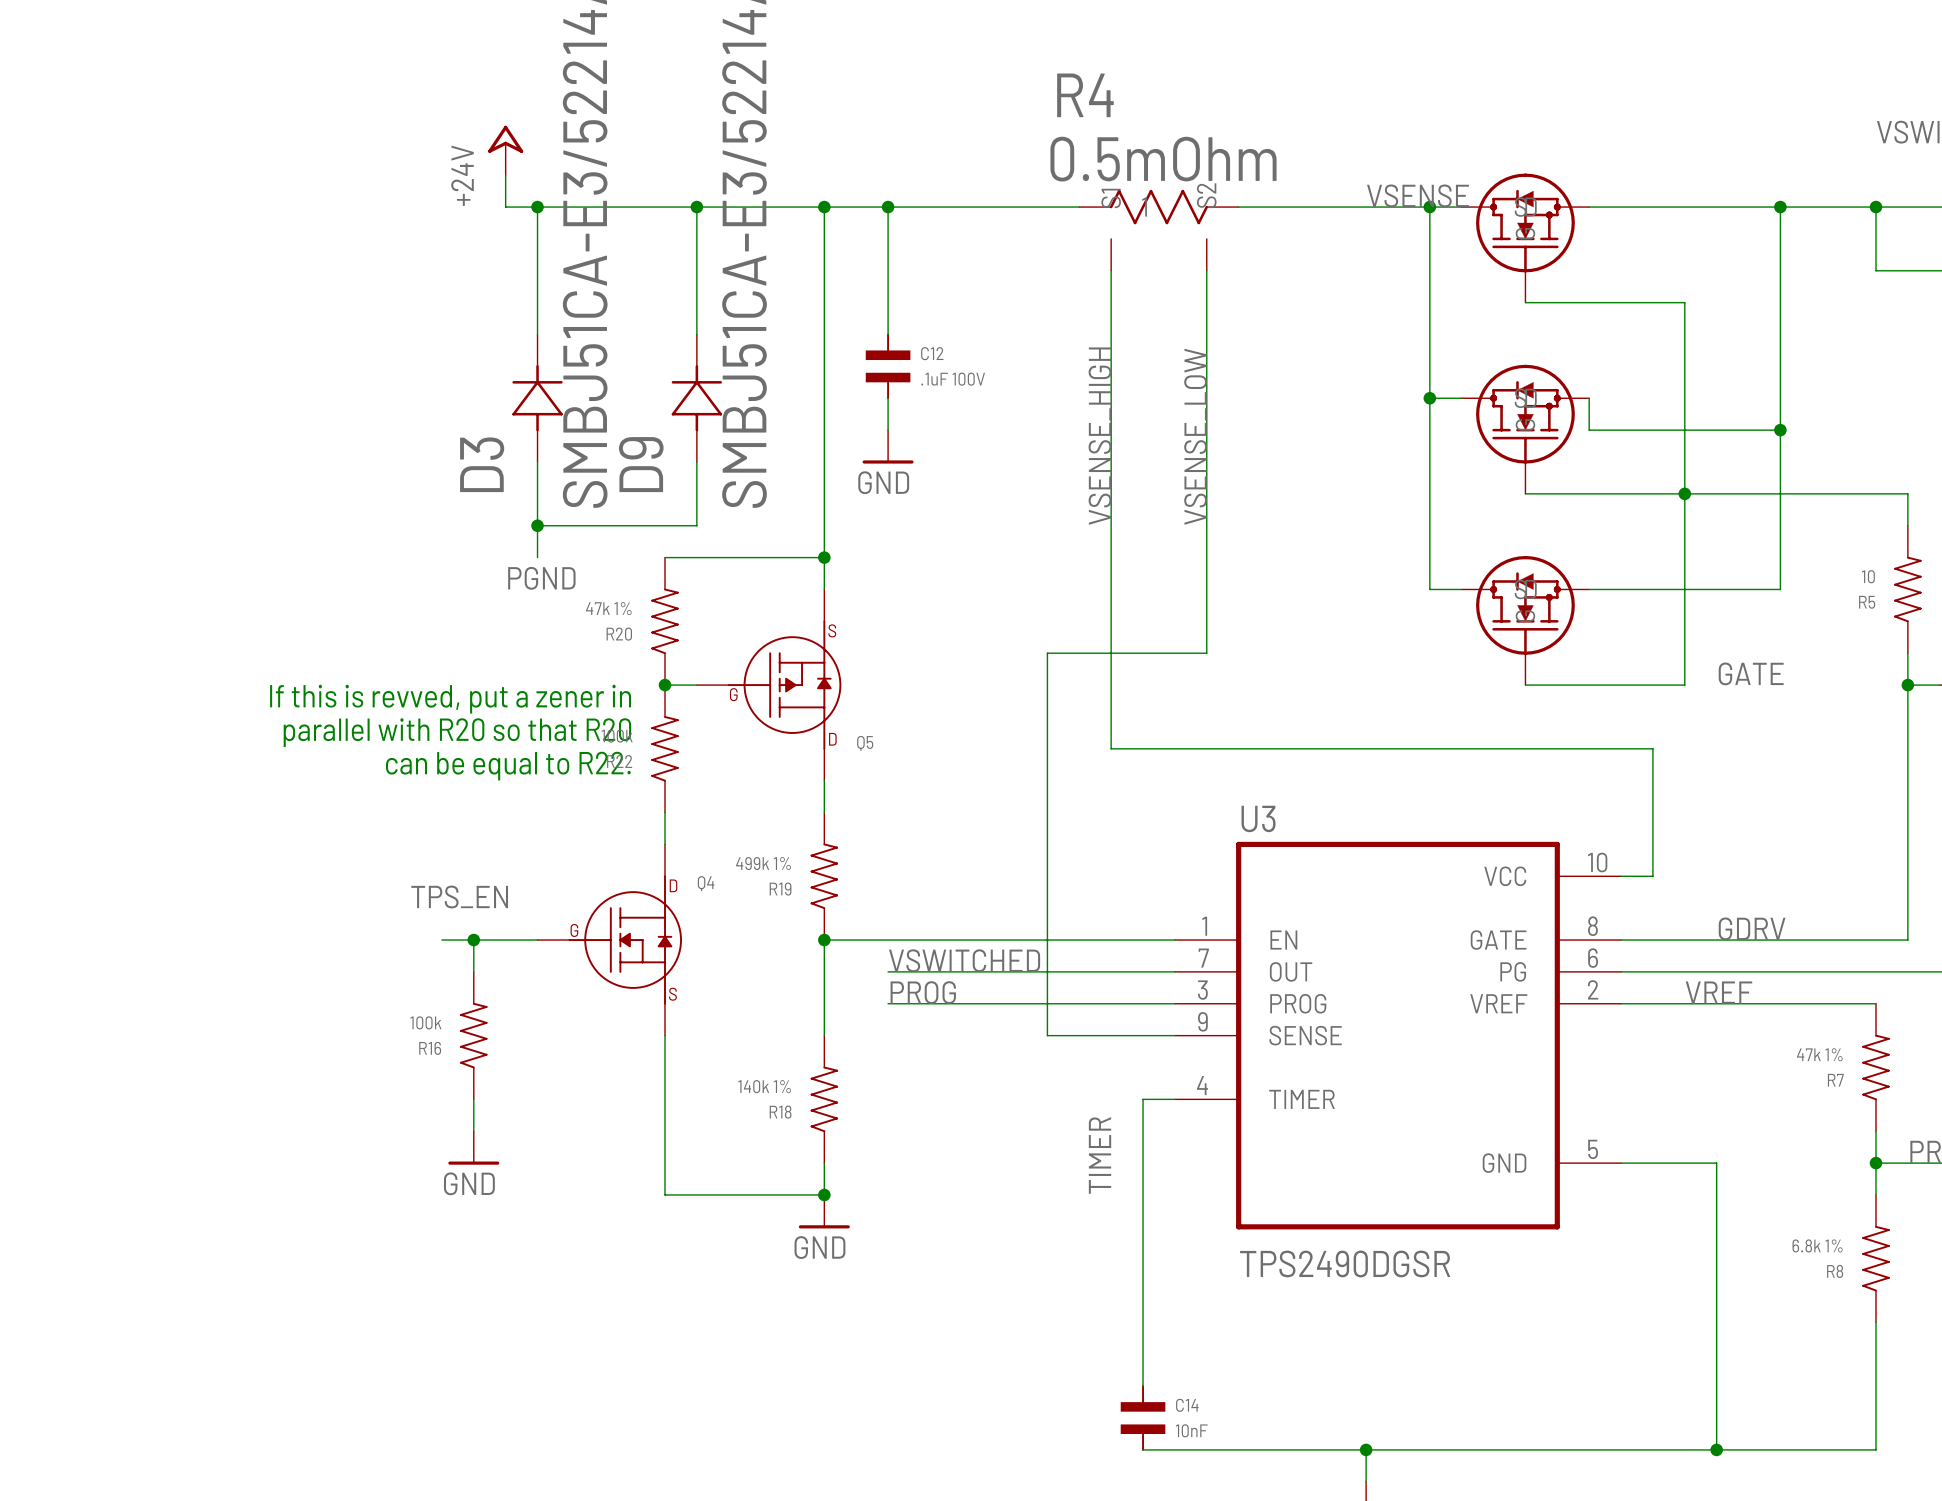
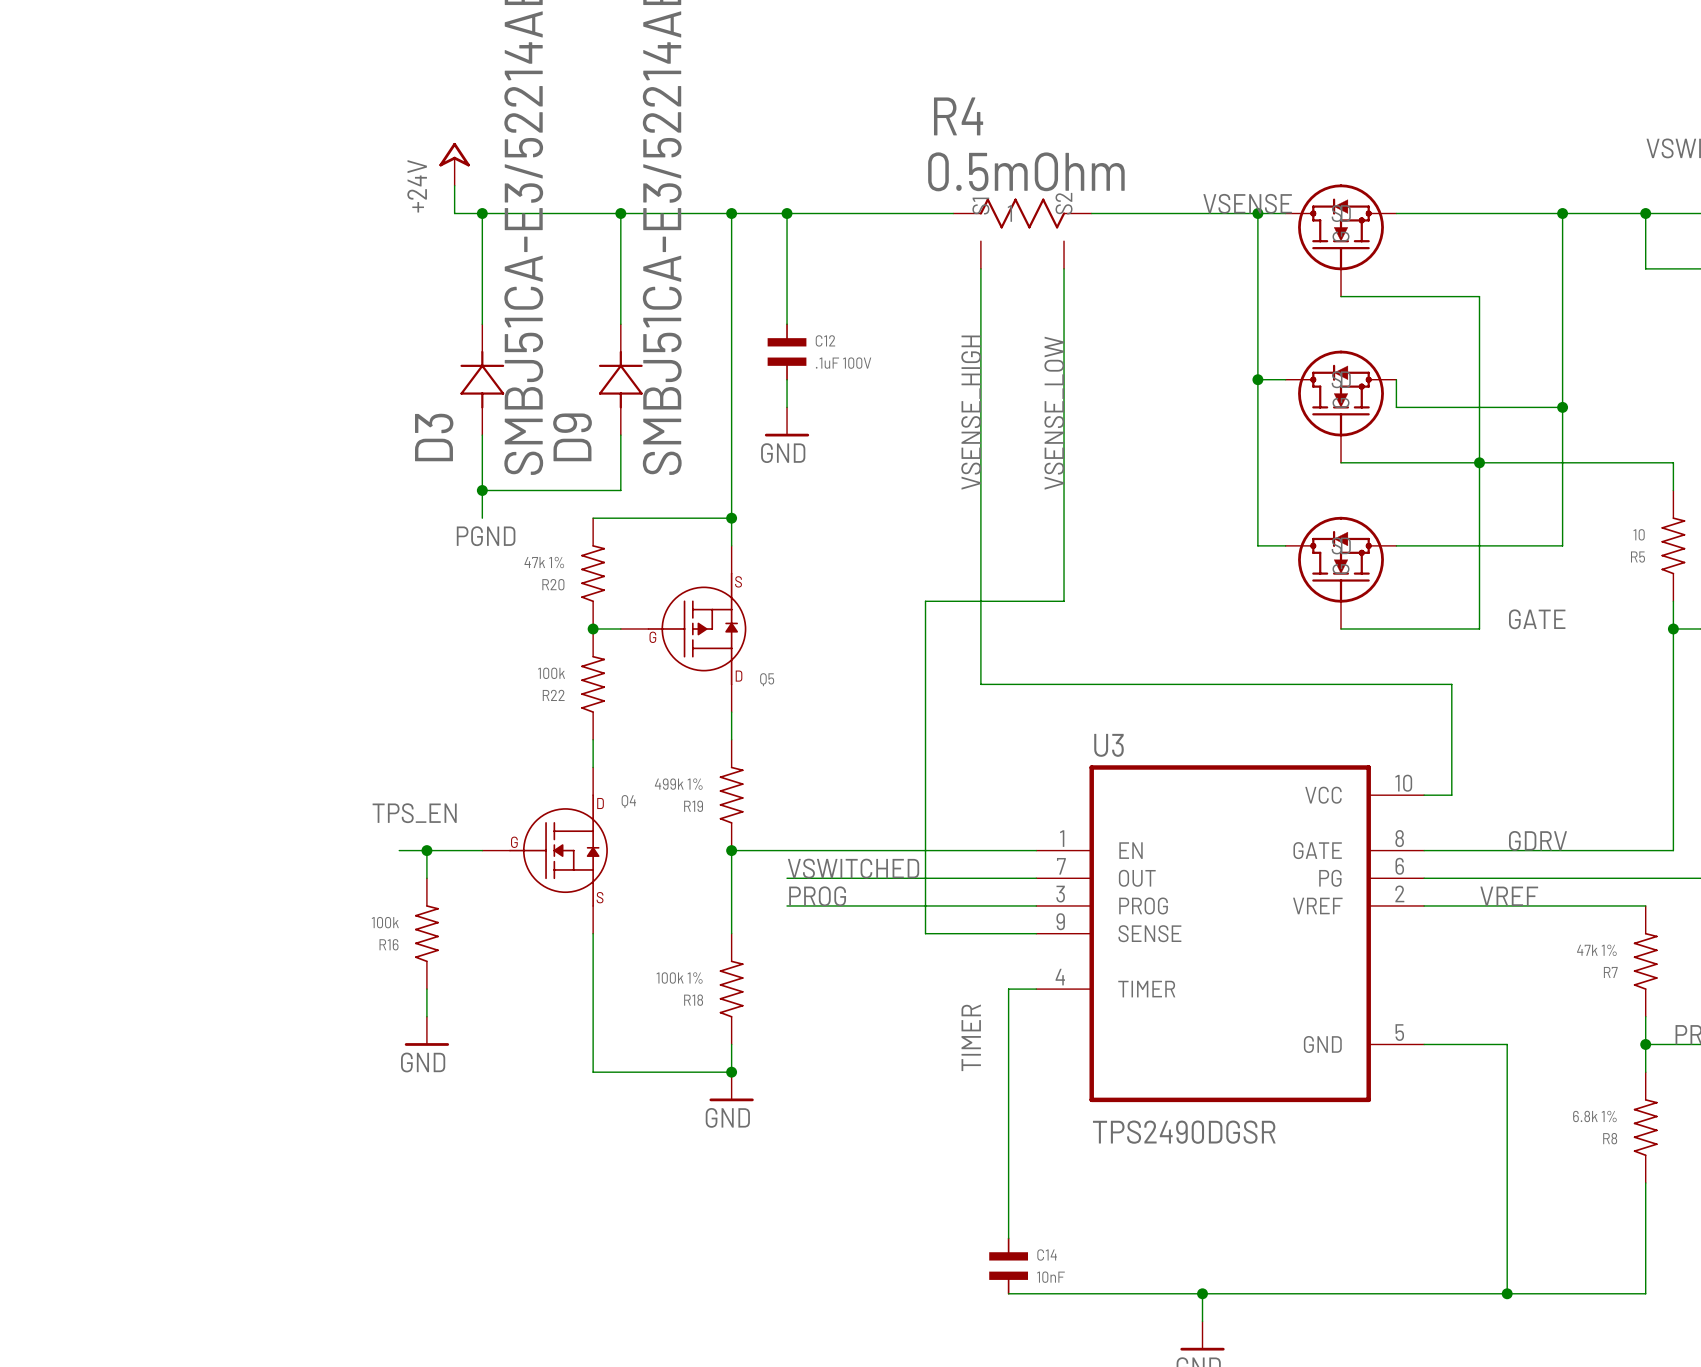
text: If this is revved, put a zener in (450, 699) -> none
text: parallel with R20 so that R20 (457, 732) -> none
text: can be equal to R22. (508, 766) -> none
R18 value: 140k 1% (764, 1086) -> 100k 1% (679, 978)

